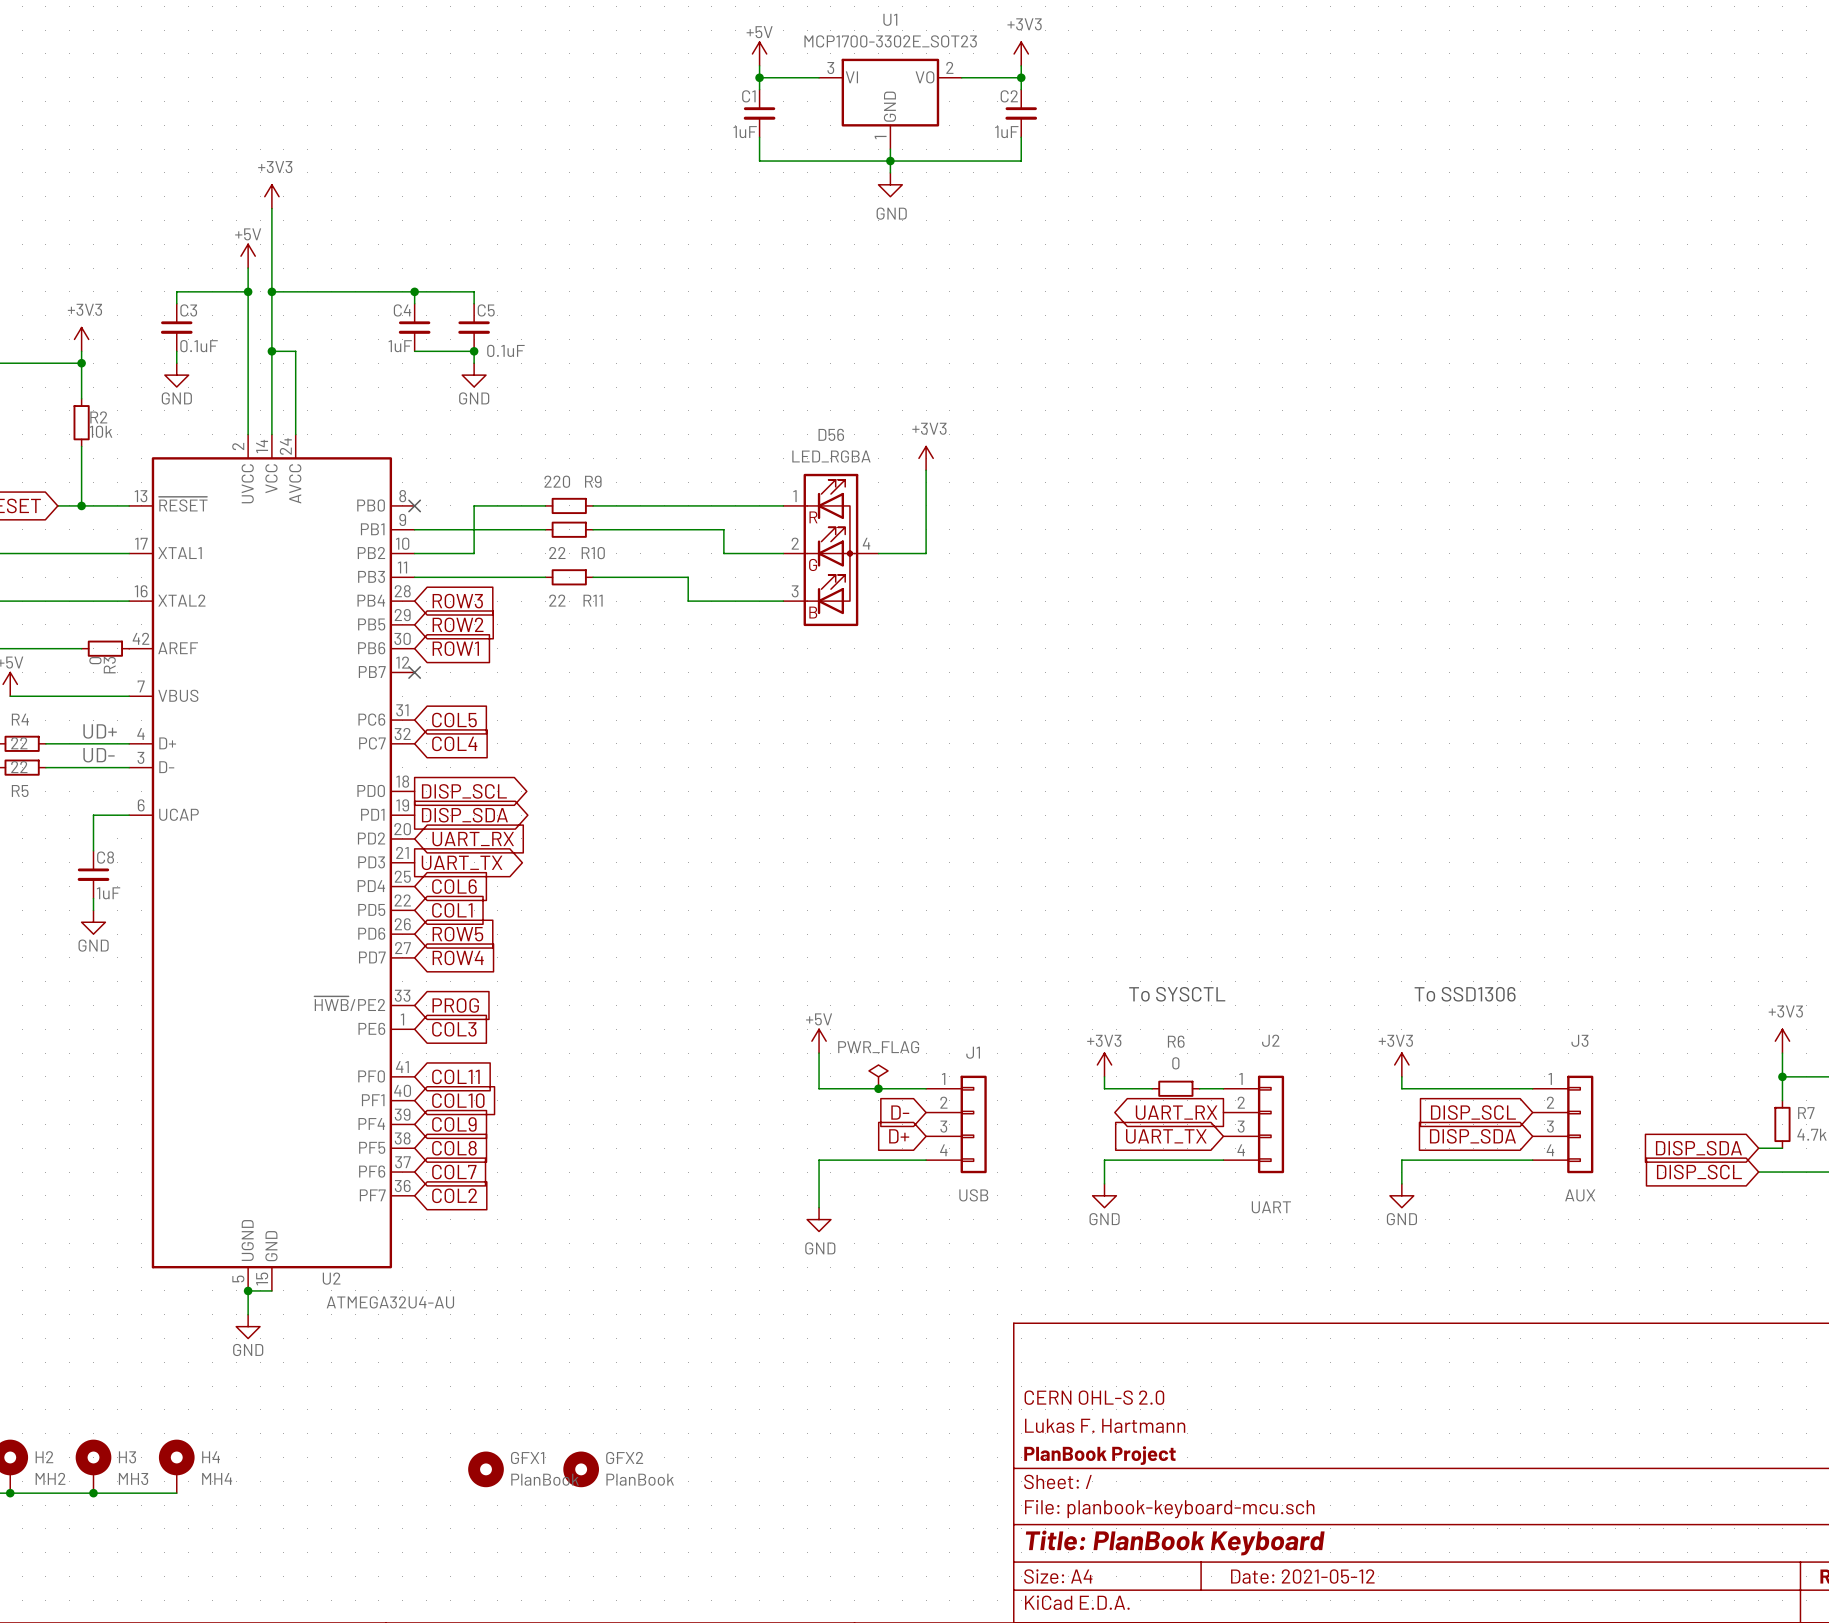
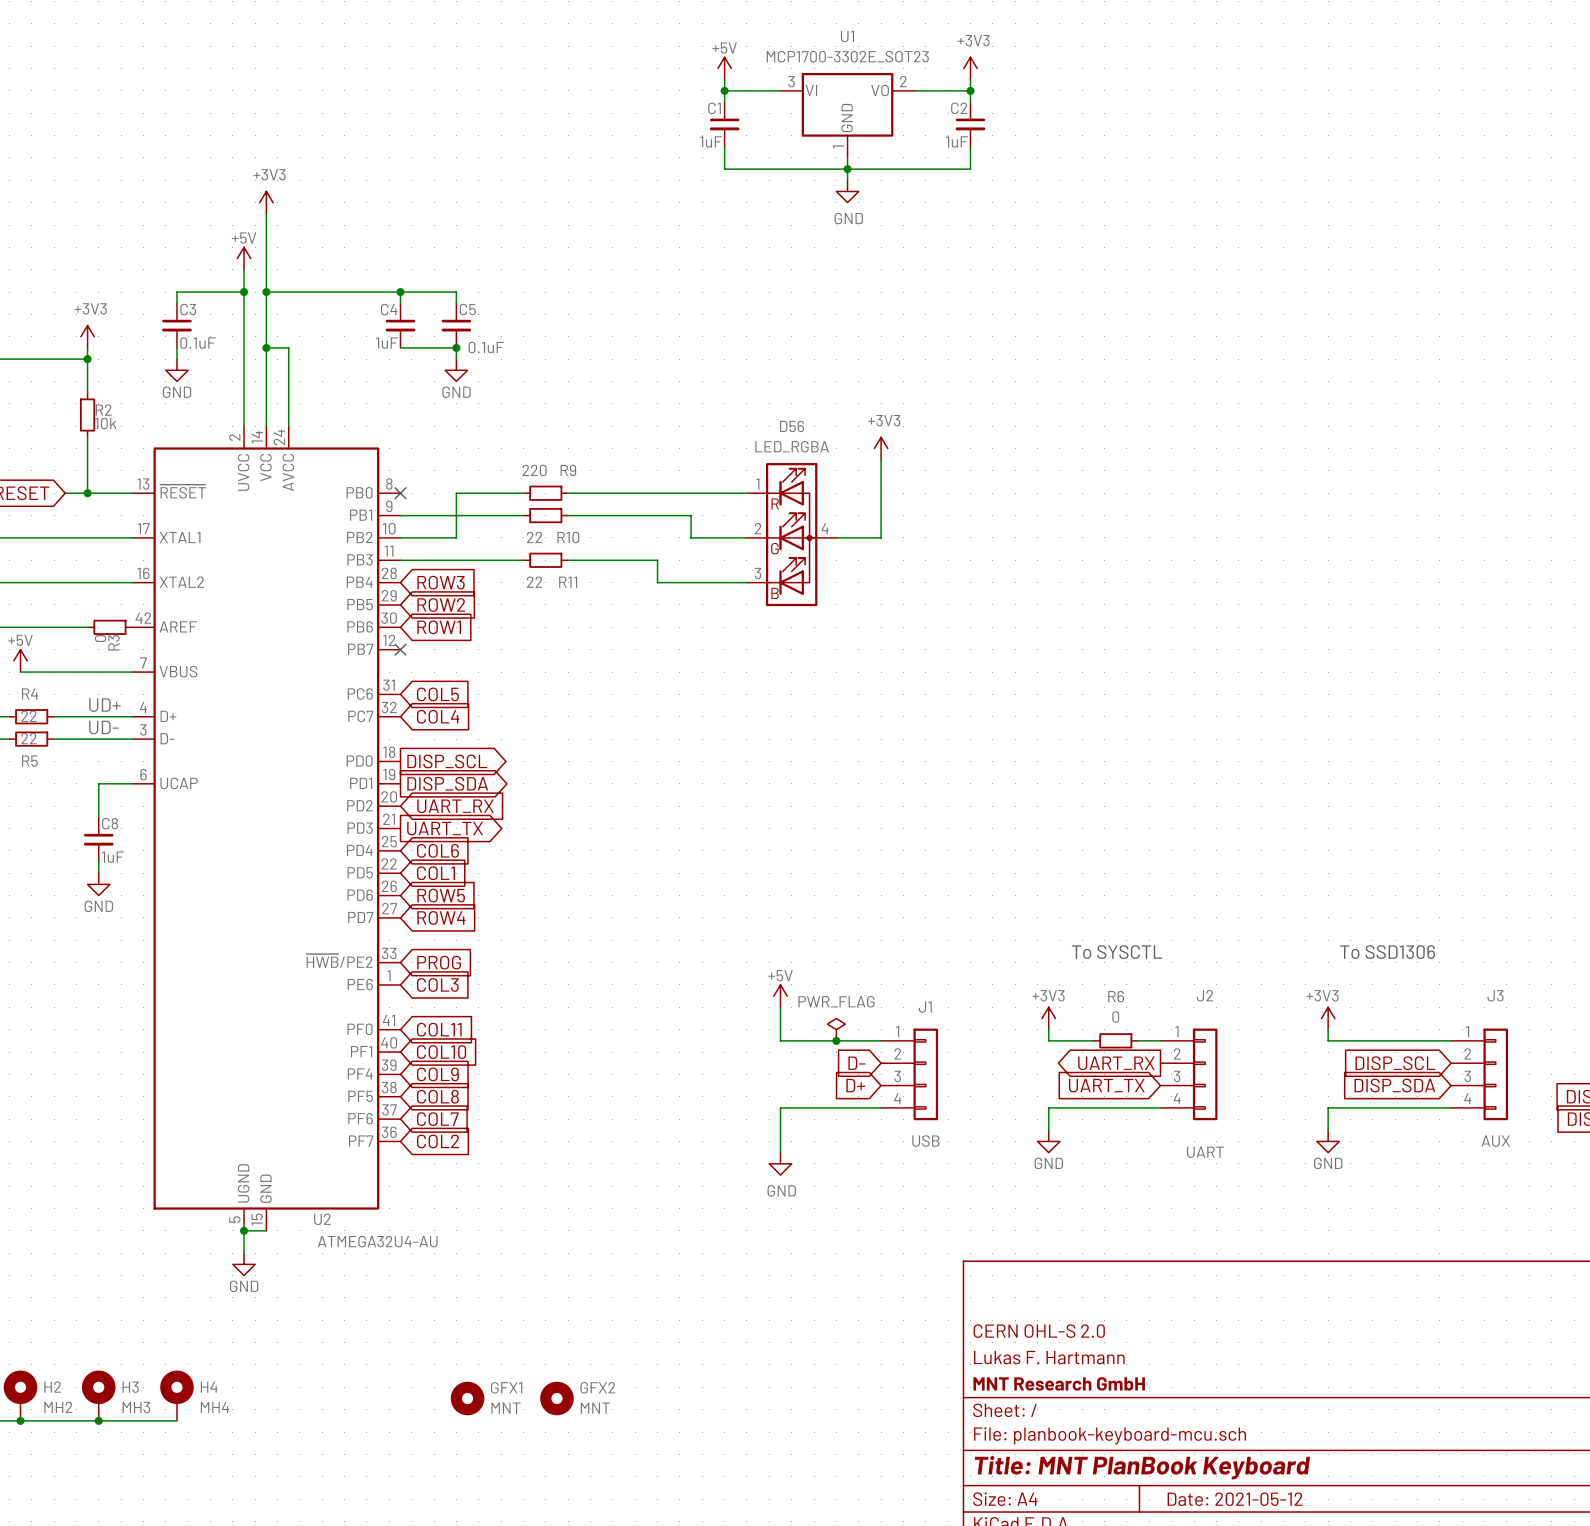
title block: PlanBook Project (1099, 1455) -> MNT Research GmbH (1059, 1383)
GFX1 value: PlanBook (545, 1479) -> MNT (505, 1408)
GFX2 value: PlanBook (640, 1479) -> MNT (595, 1408)
title block: Title: PlanBook Keyboard (1175, 1543) -> Title: MNT PlanBook Keyboard (1142, 1467)

